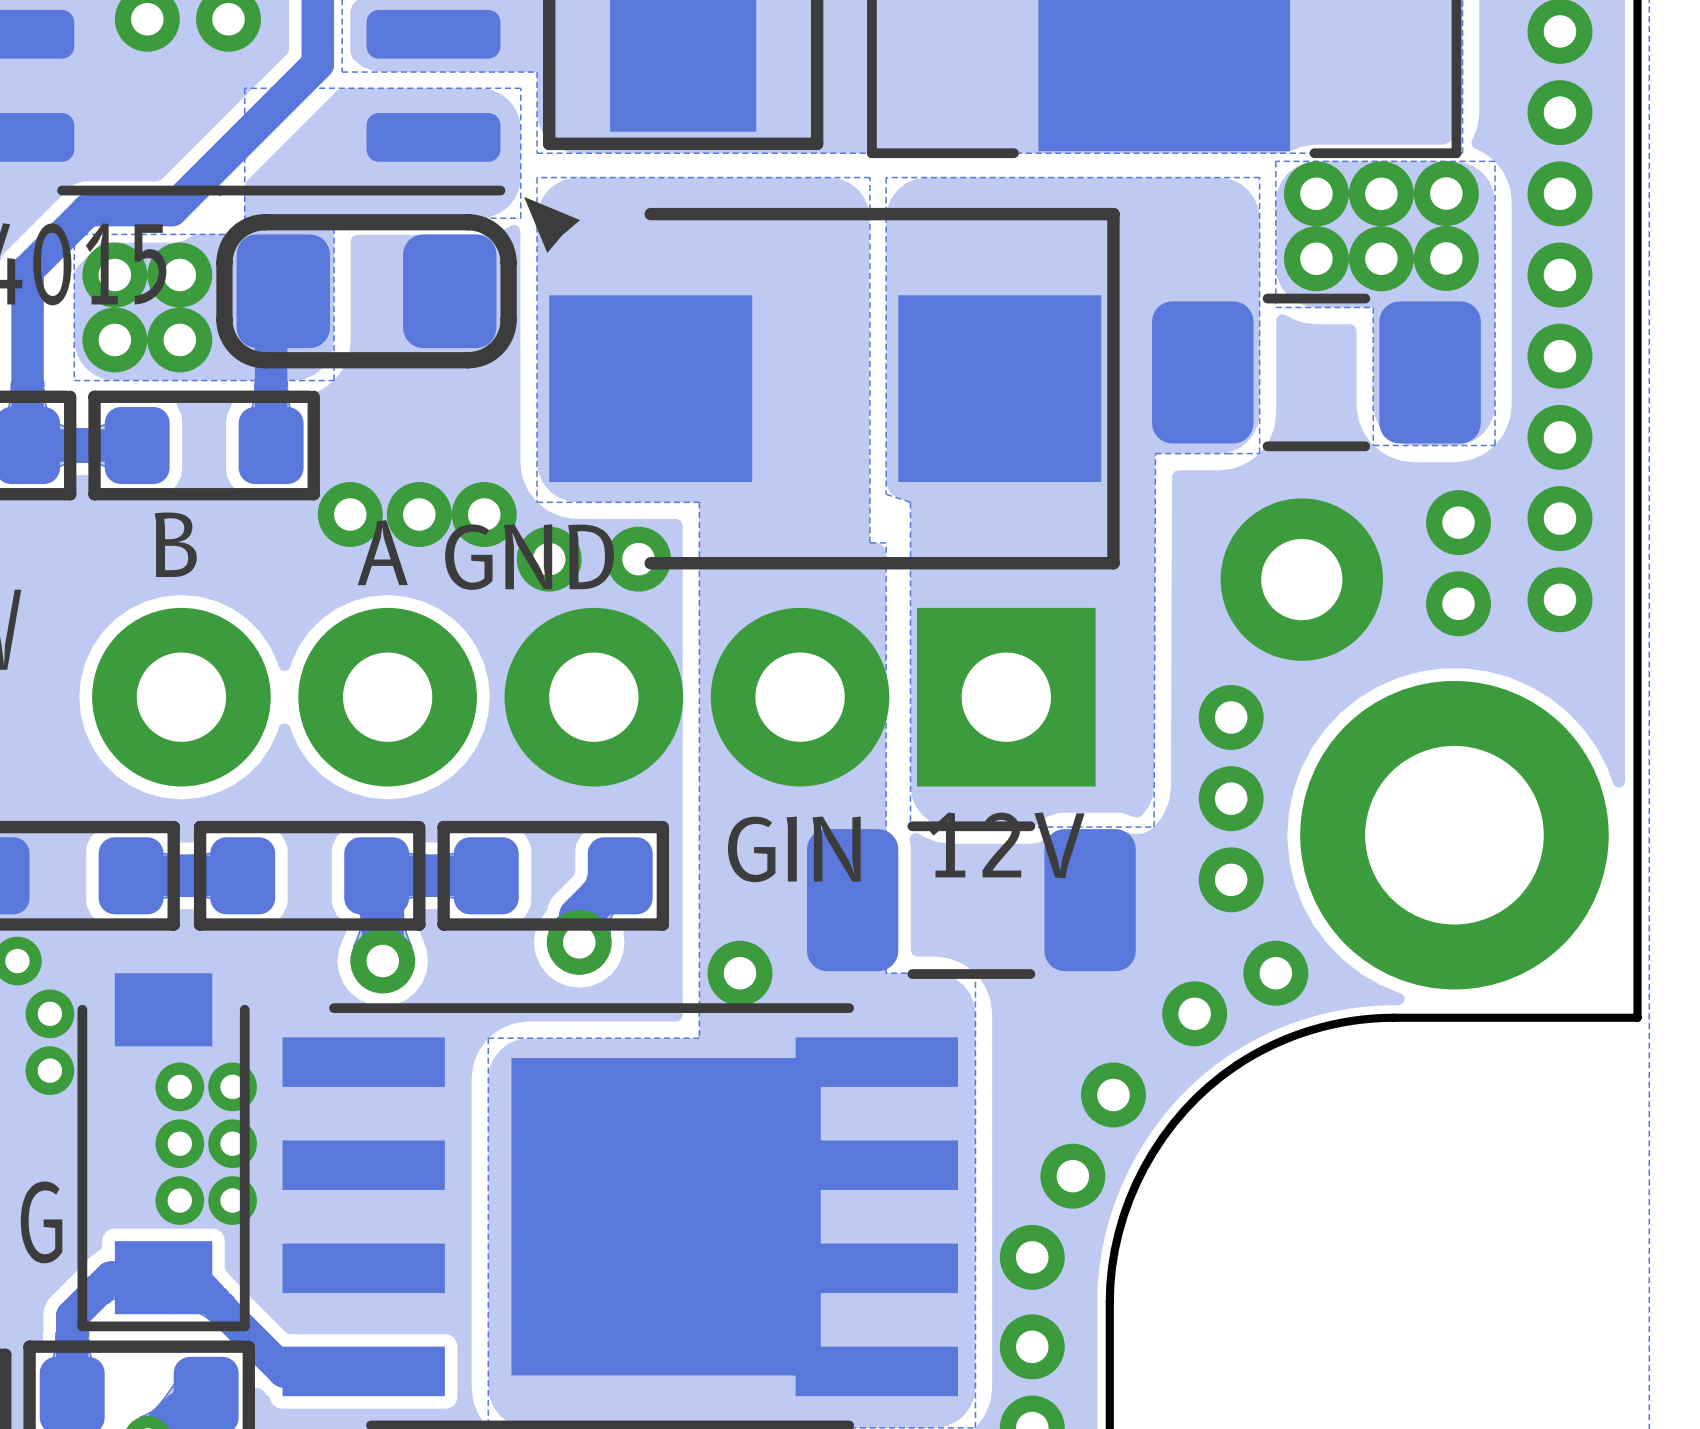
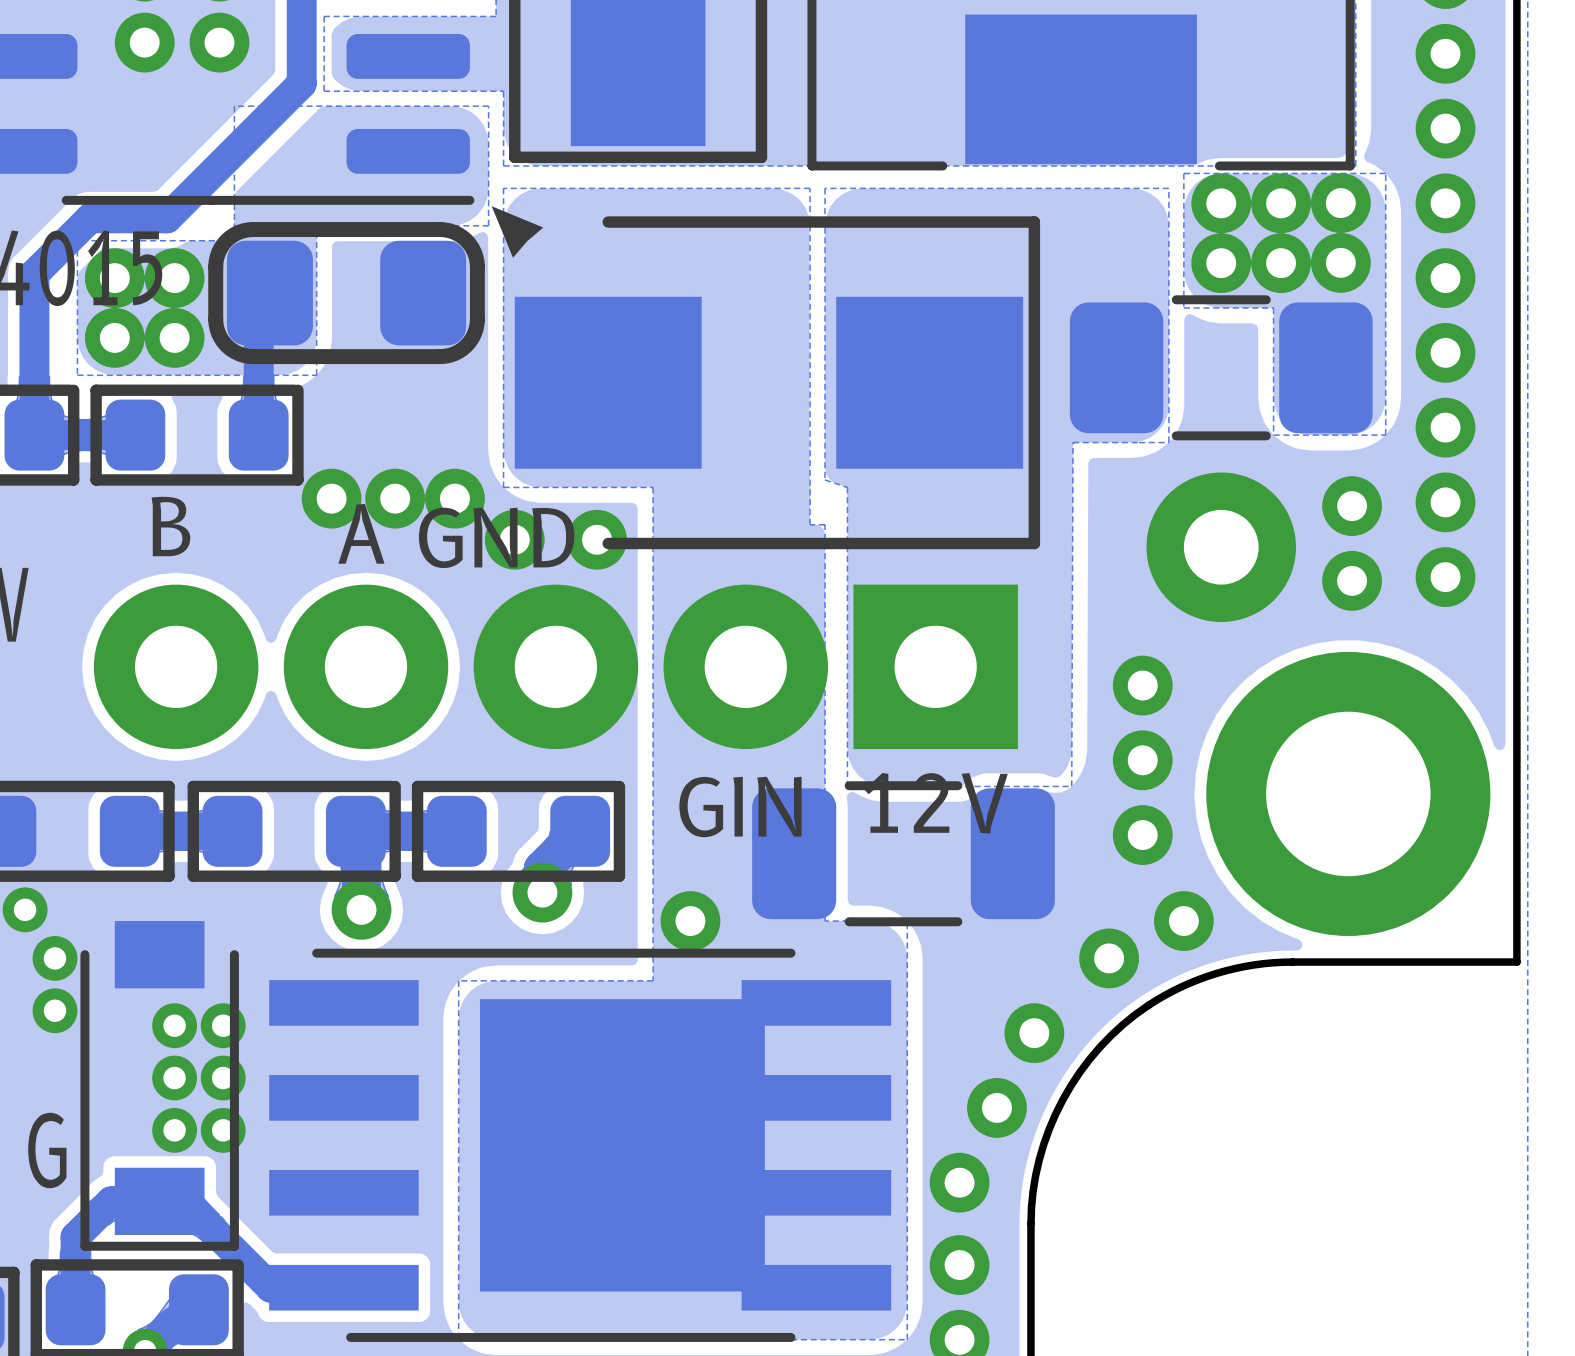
part position: (1301, 579) -> (1221, 547)

